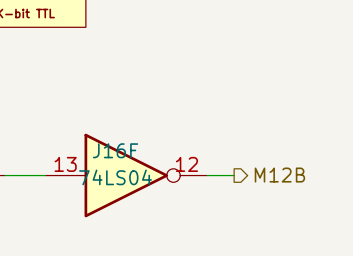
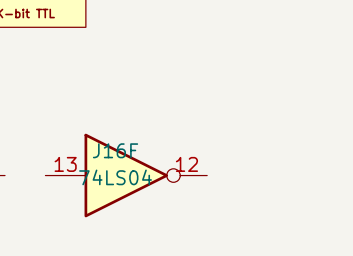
wire: (5, 175) (45, 175) -> none
wire: (207, 175) (234, 175) -> none
hierarchical label: M12B (279, 175) -> none

